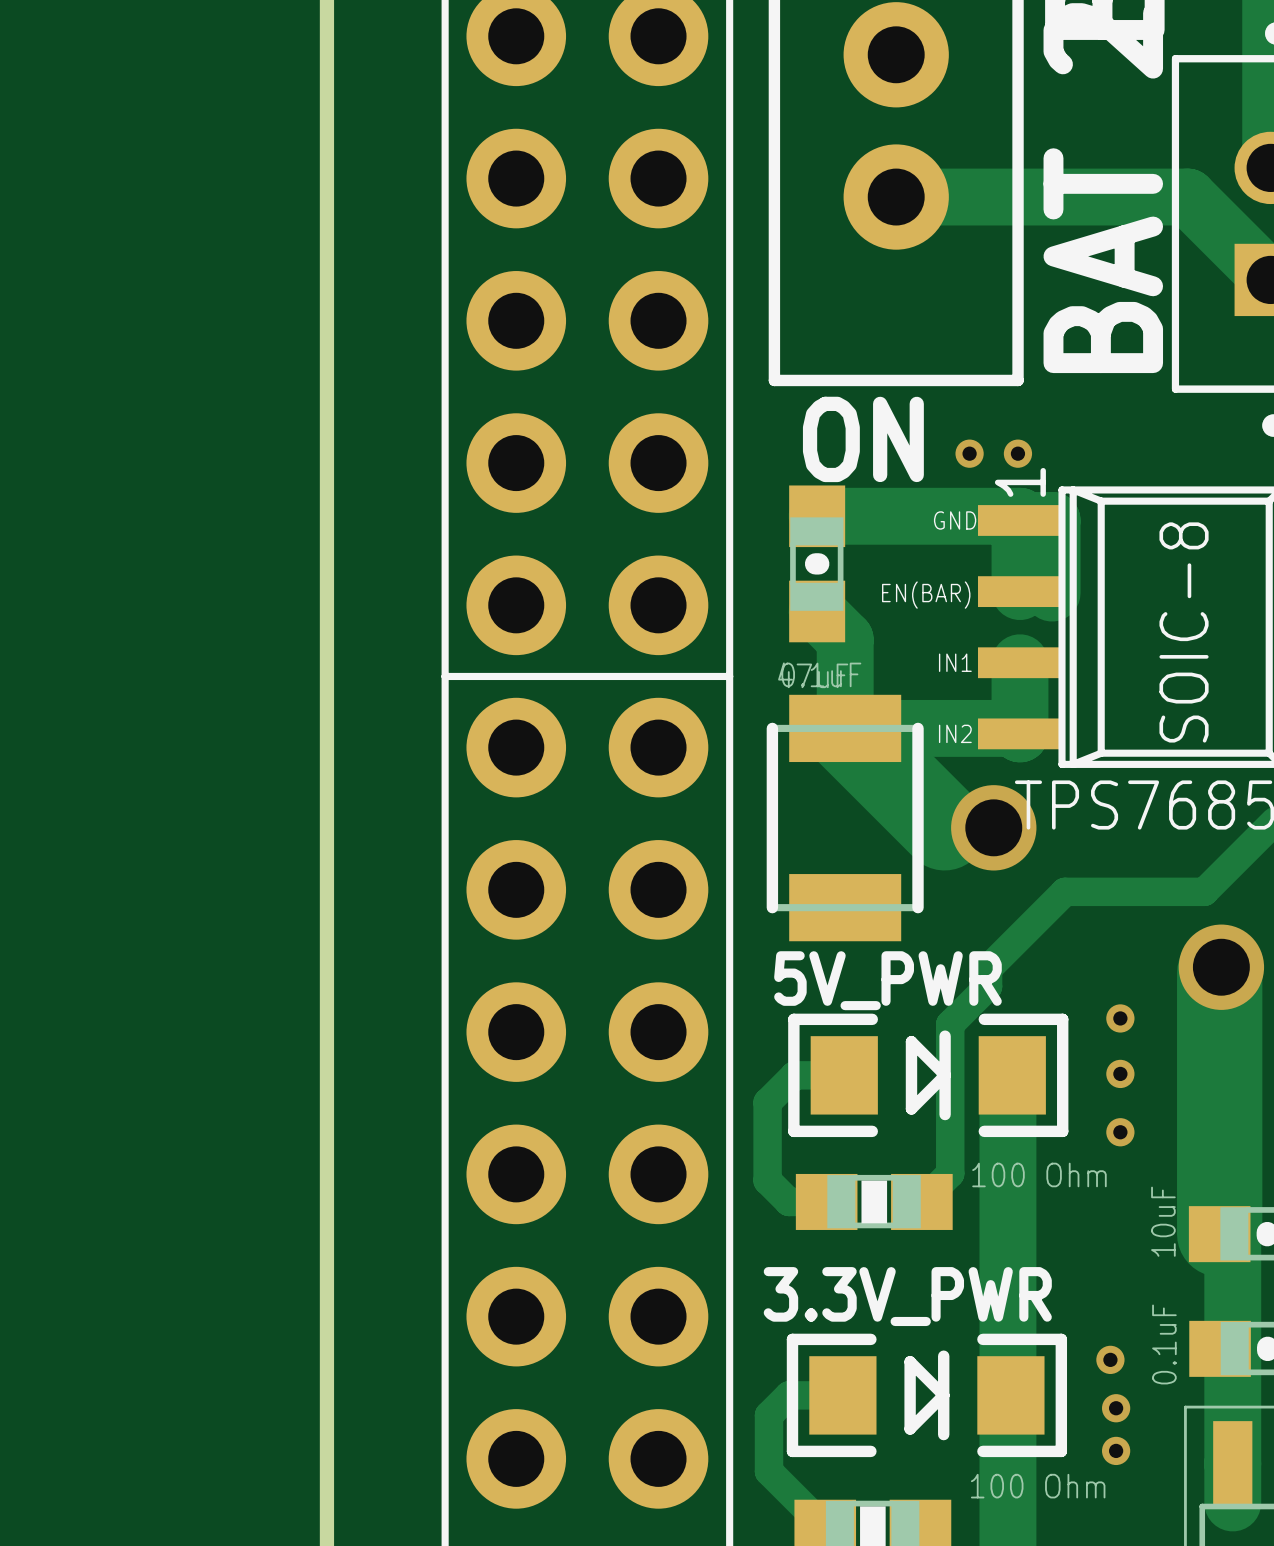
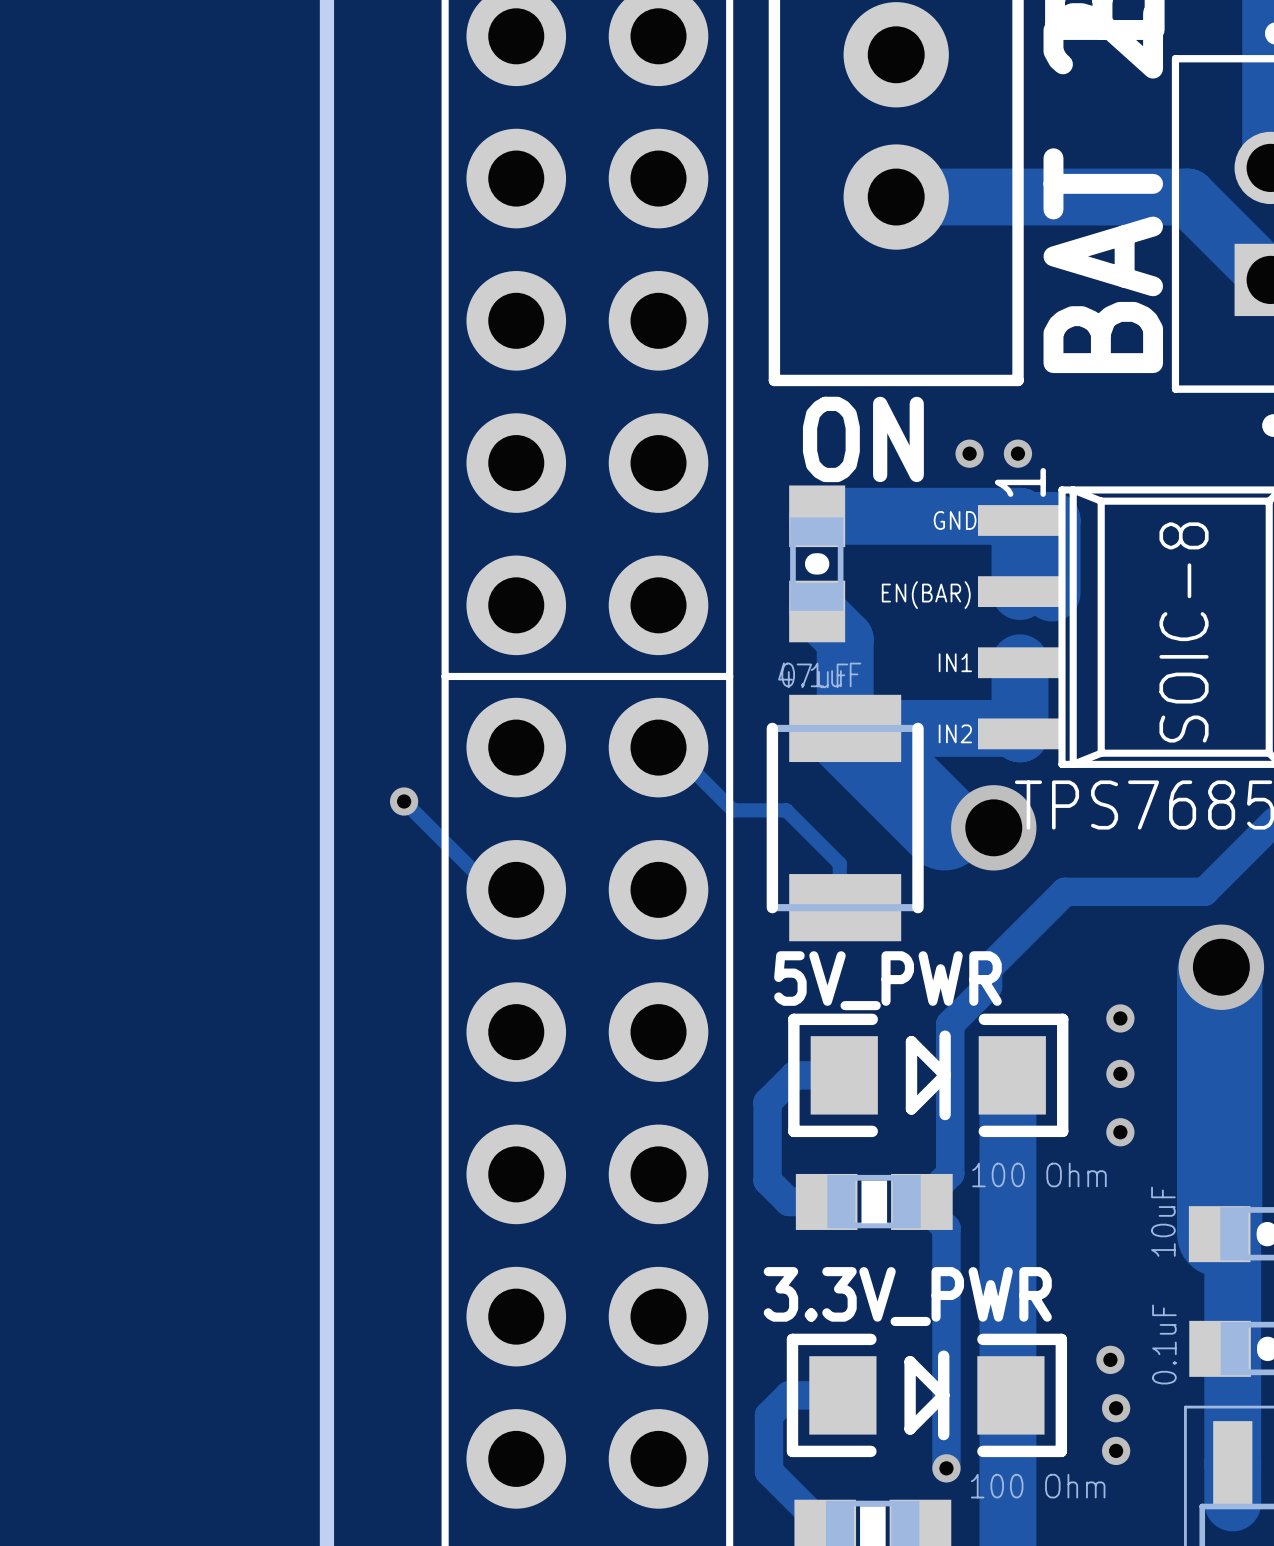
track: none -> (658, 747) (661, 739) (733, 810) (786, 810) (839, 863) (839, 899) (845, 907)
track: none -> (404, 801) (484, 881) (510, 881) (516, 889)
via: none -> (404, 801)
track: none -> (921, 1201) (946, 1228) (946, 1468)
via: none -> (946, 1468)

